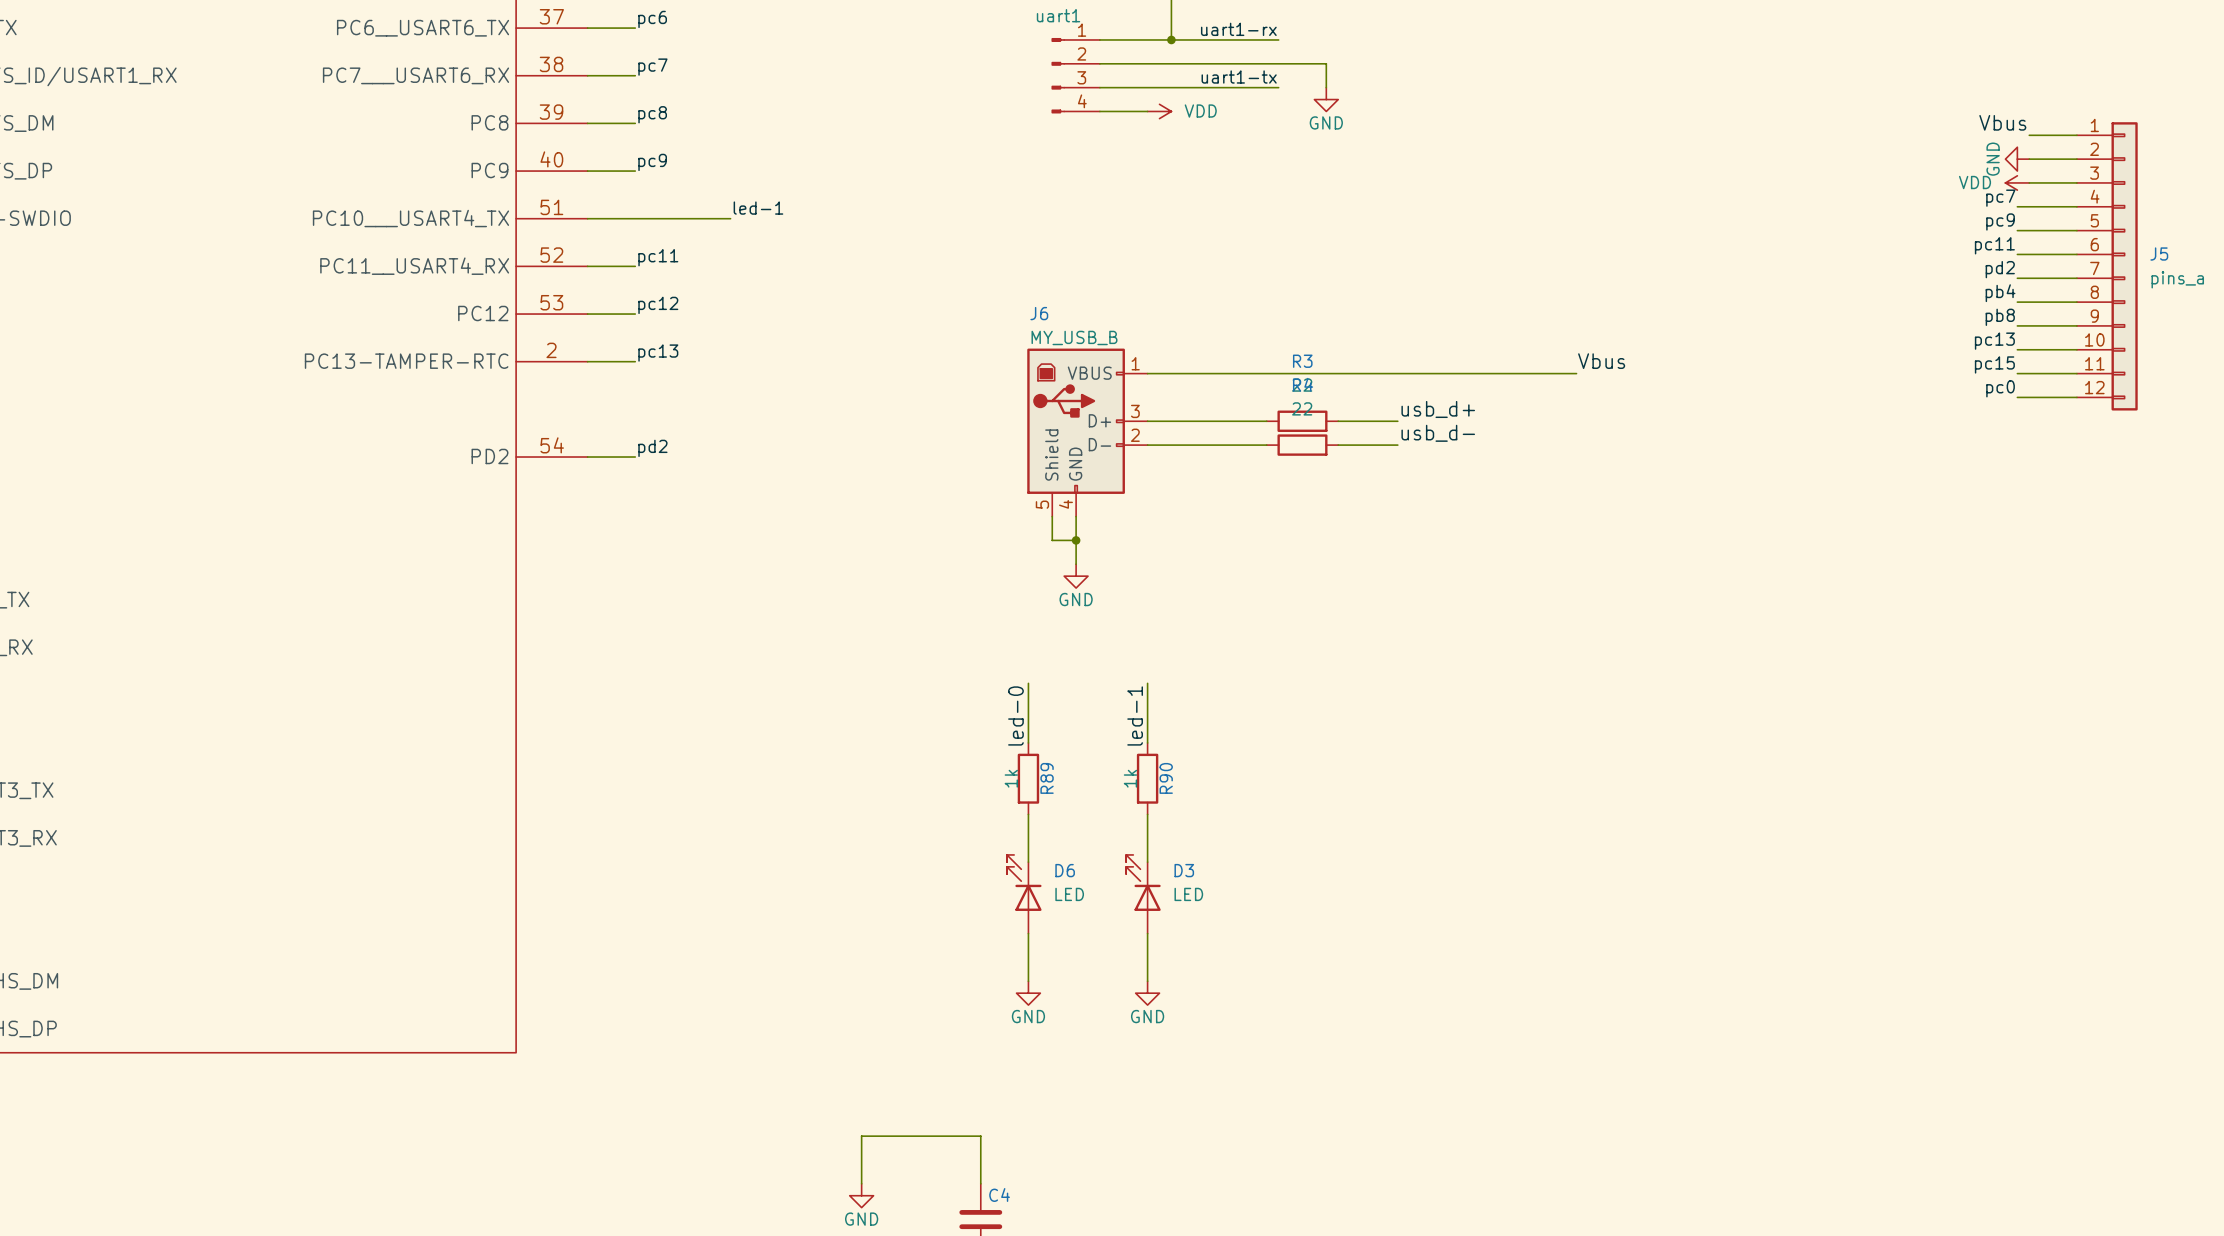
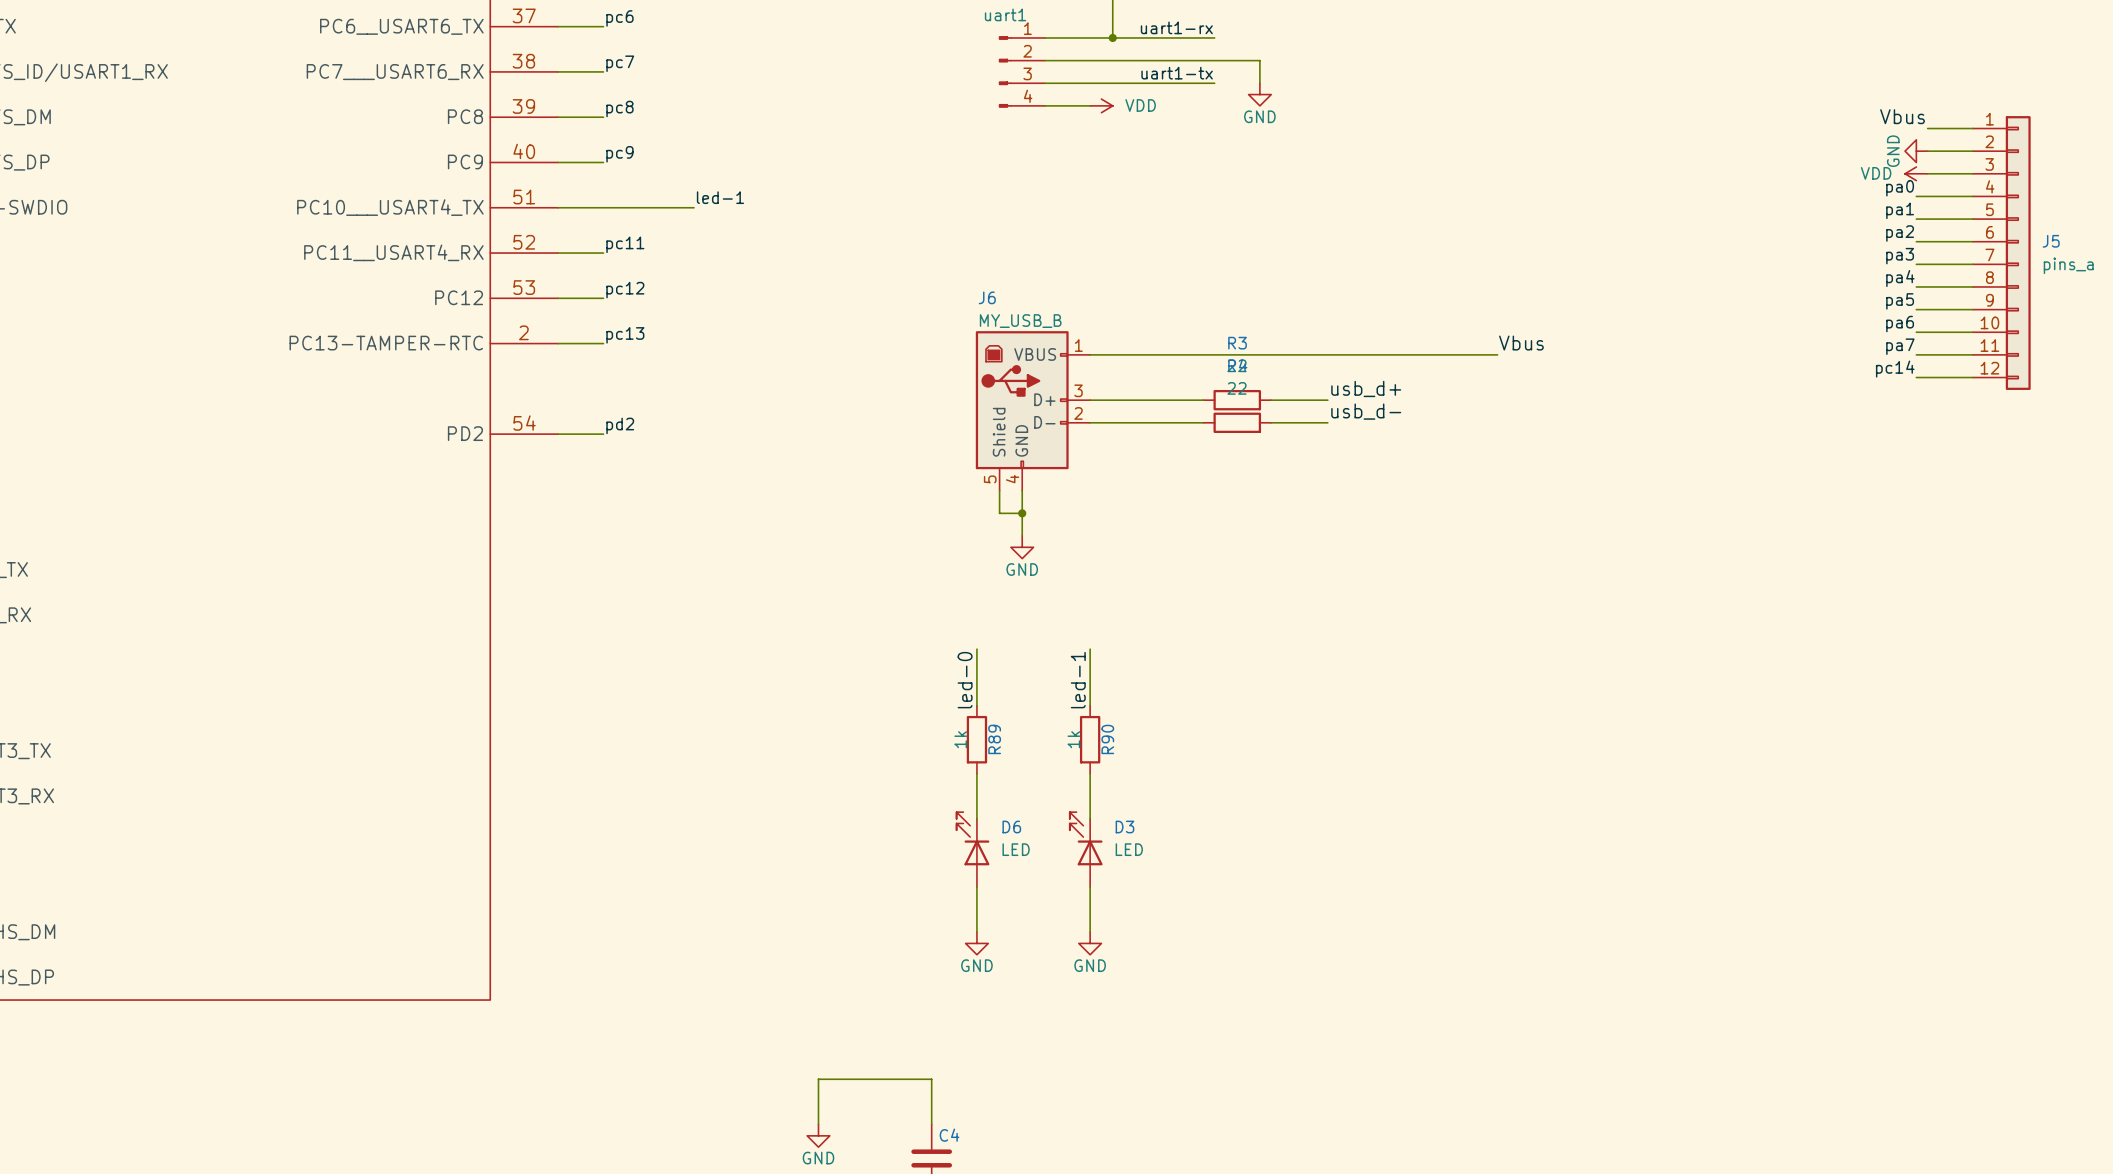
label: pc7 (2000, 198) -> pa0 (1900, 188)
label: pc9 (2000, 221) -> pa1 (1900, 210)
label: pc11 (1994, 245) -> pa2 (1900, 233)
label: pd2 (2000, 269) -> pa3 (1900, 256)
label: pb4 (2000, 293) -> pa4 (1900, 278)
label: pb8 (2000, 317) -> pa5 (1900, 301)
label: pc13 (1994, 341) -> pa6 (1900, 324)
label: pc15 (1994, 364) -> pa7 (1900, 346)
label: pc0 (2000, 388) -> pc14 (1895, 369)

